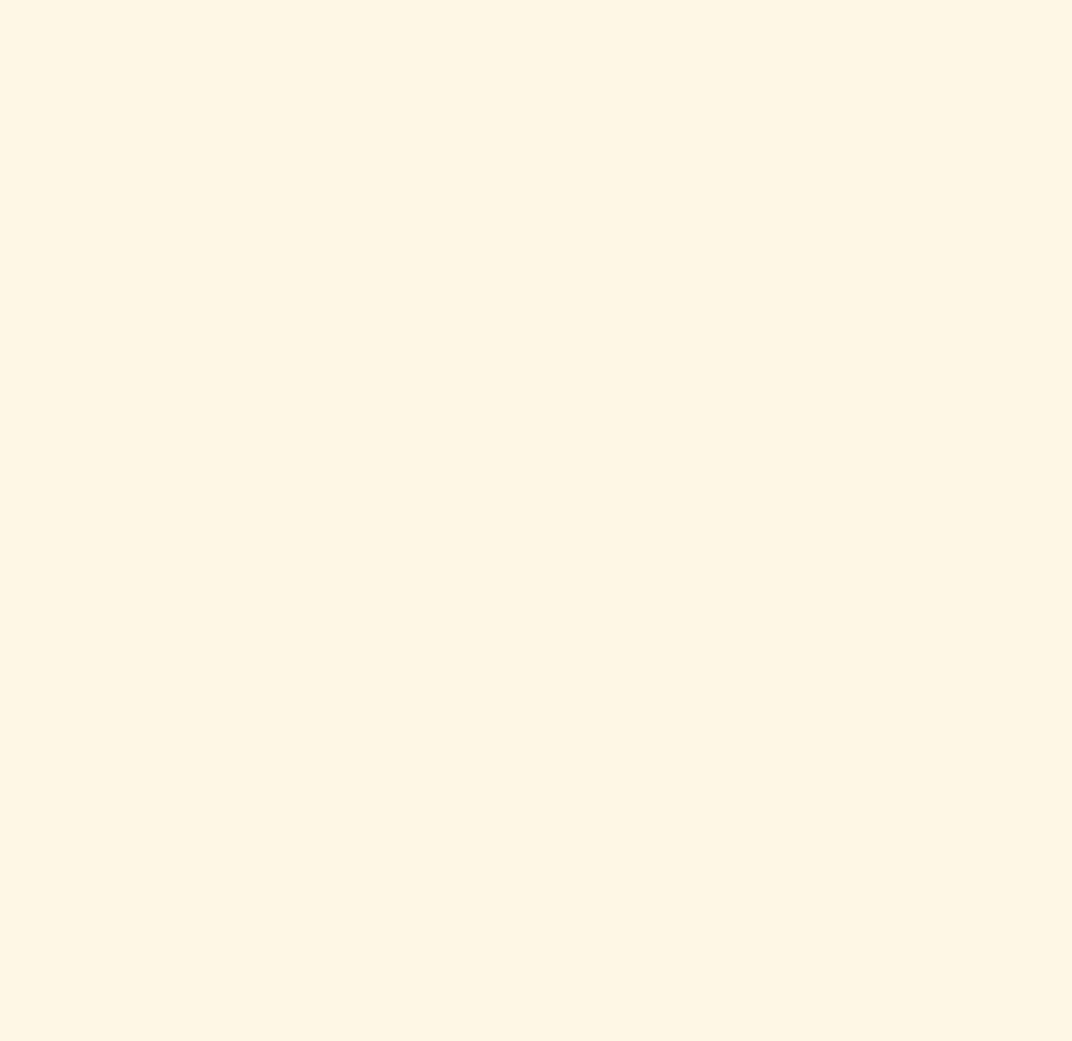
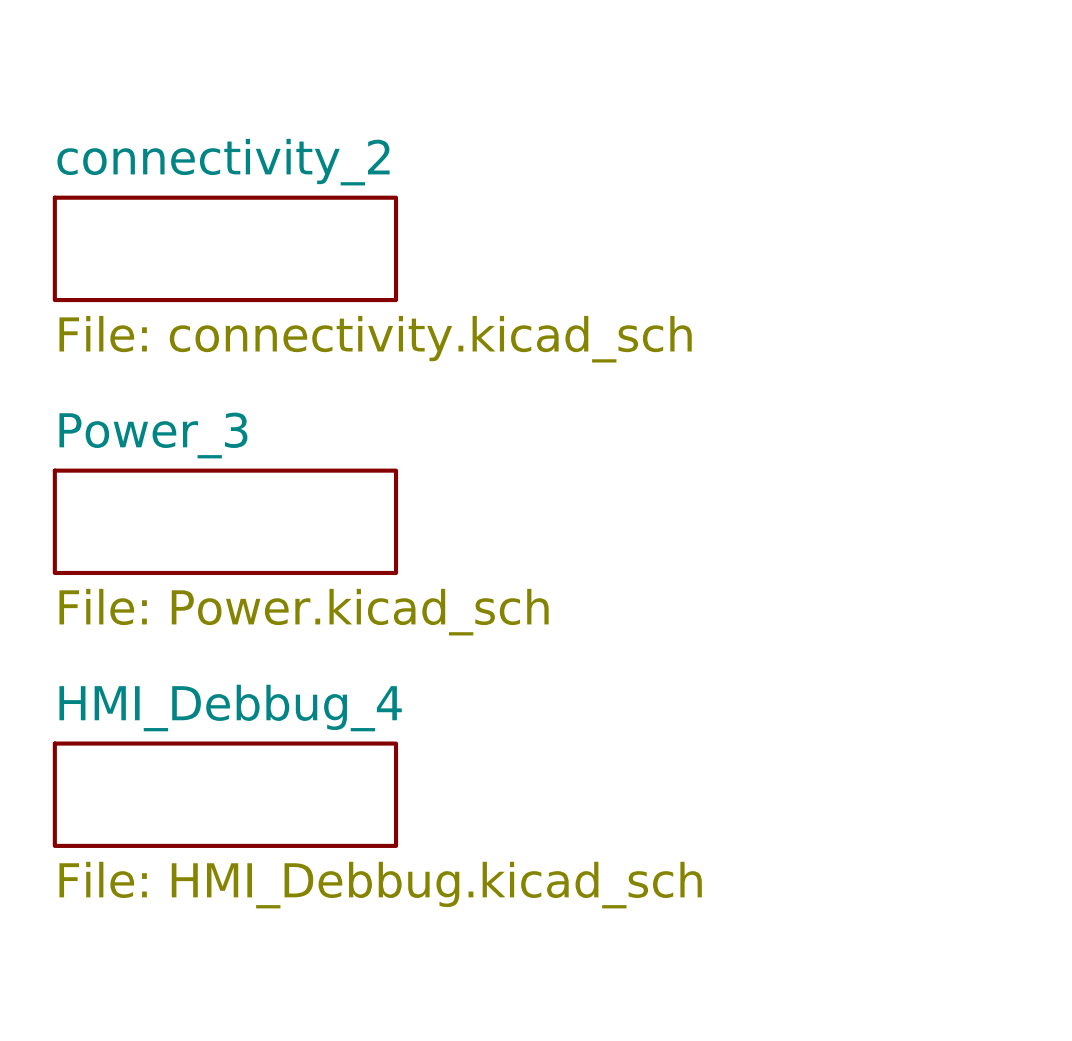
sheet connectivity_2: none -> File: connectivity.kicad_sch (225, 248)
sheet Power_3: none -> File: Power.kicad_sch (225, 521)
sheet HMI_Debbug_4: none -> File: HMI_Debbug.kicad_sch (225, 794)

